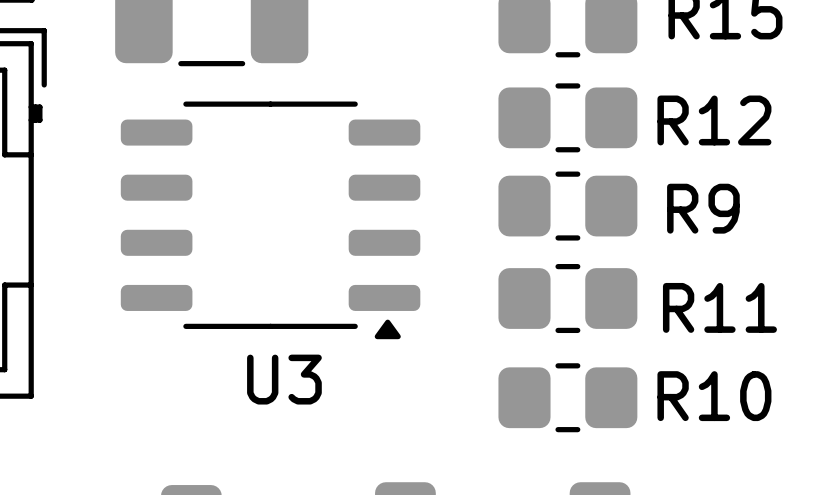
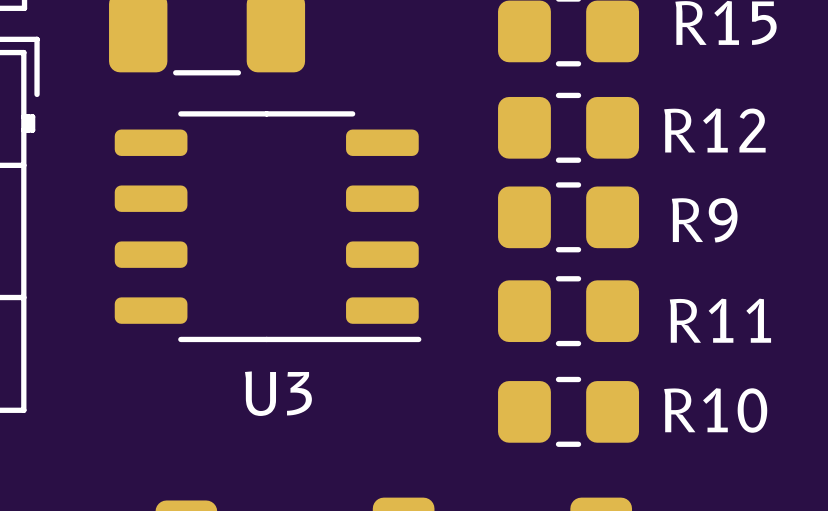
U3 footprint: [120, 101, 421, 340] -> [114, 111, 422, 343]

